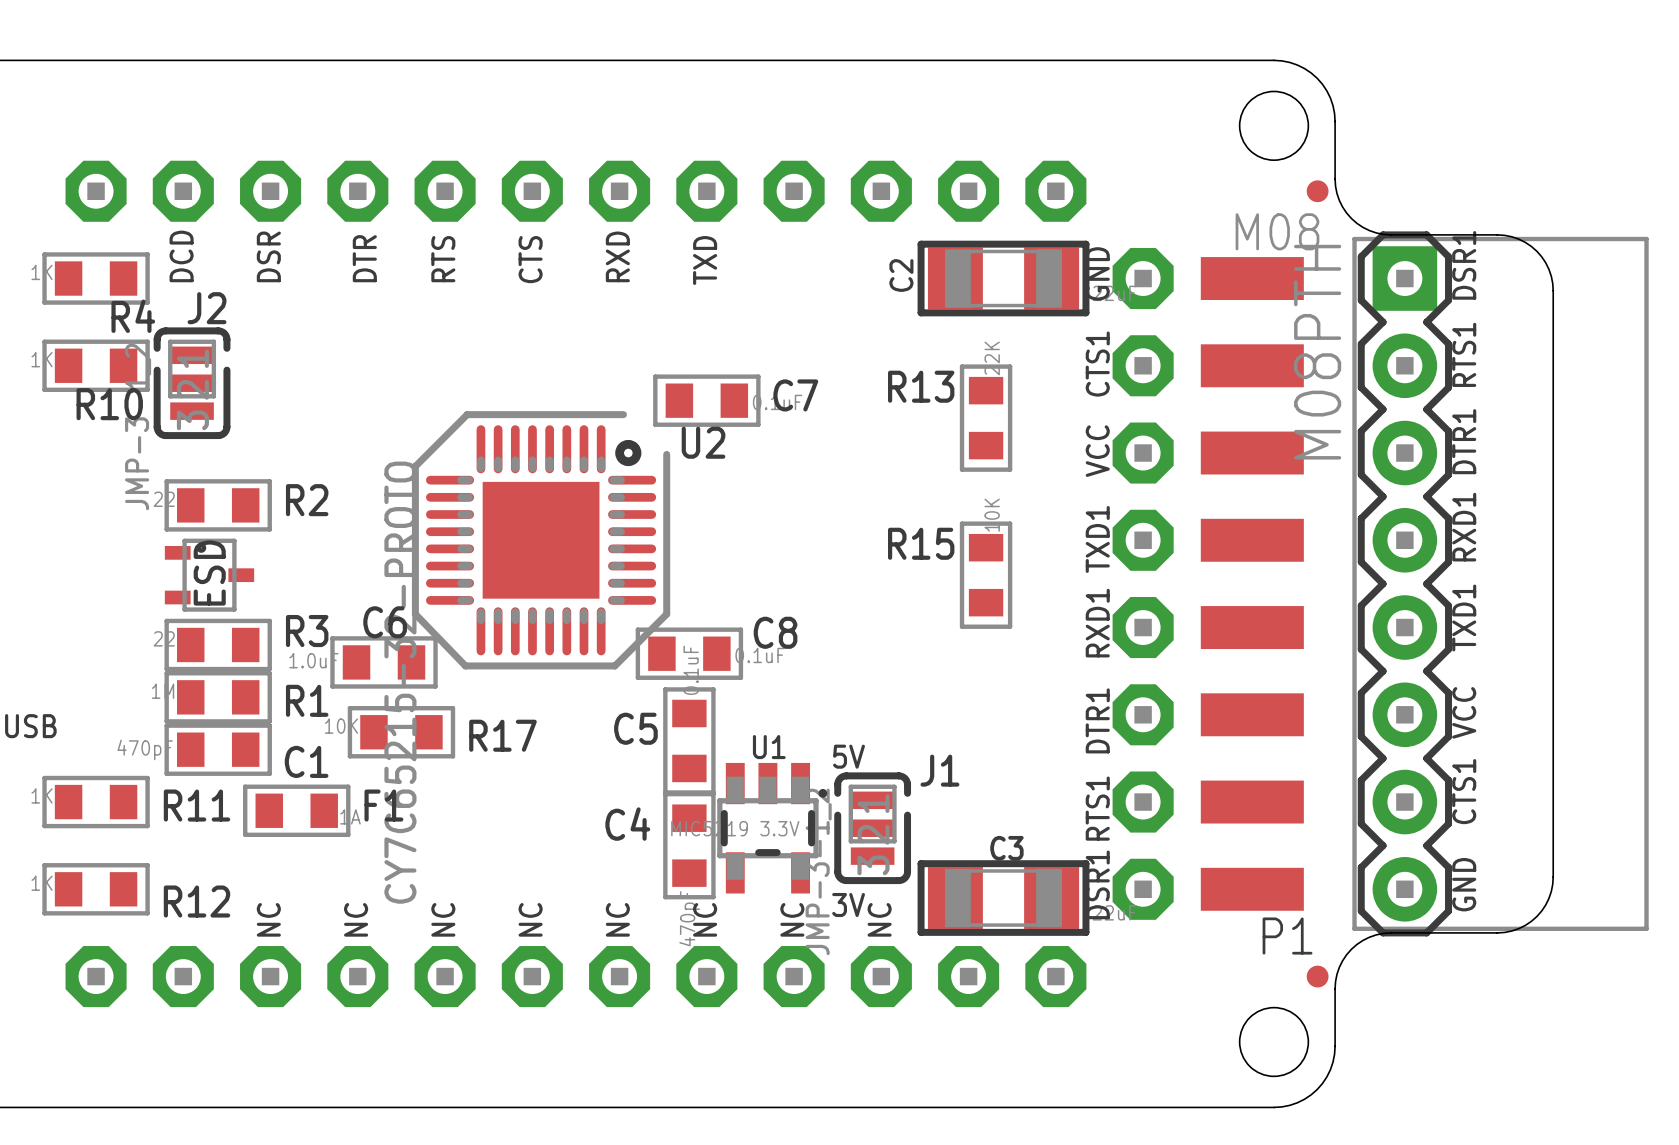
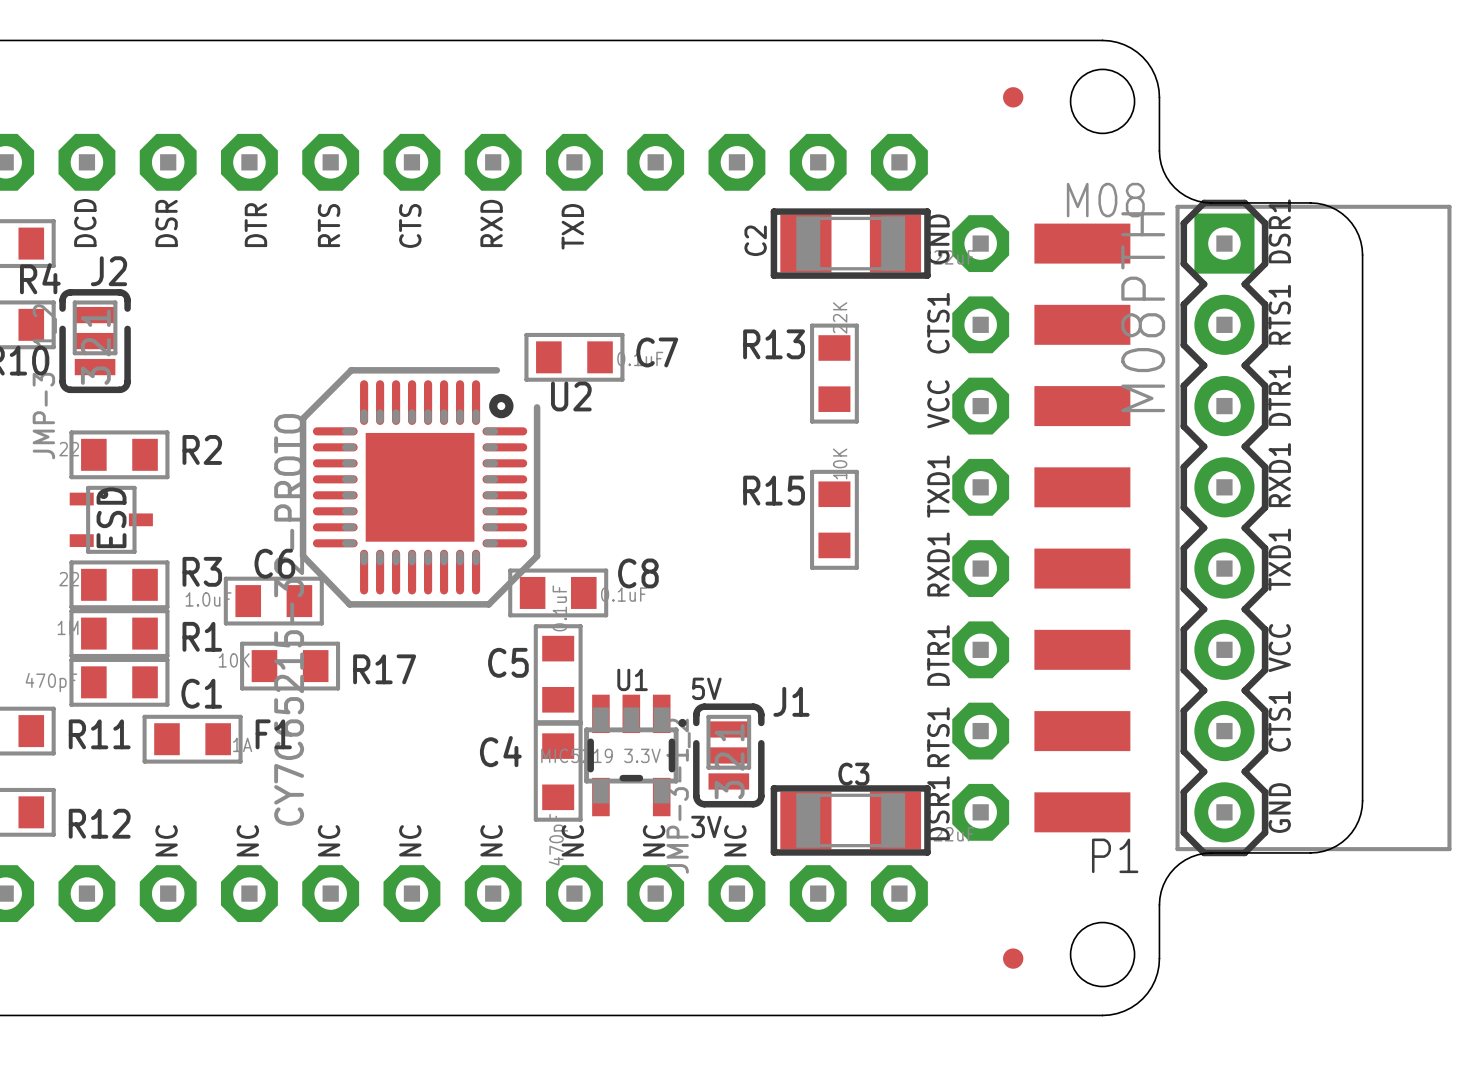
part position: (1317, 191) -> (1013, 97)
part position: (1317, 976) -> (1013, 958)

